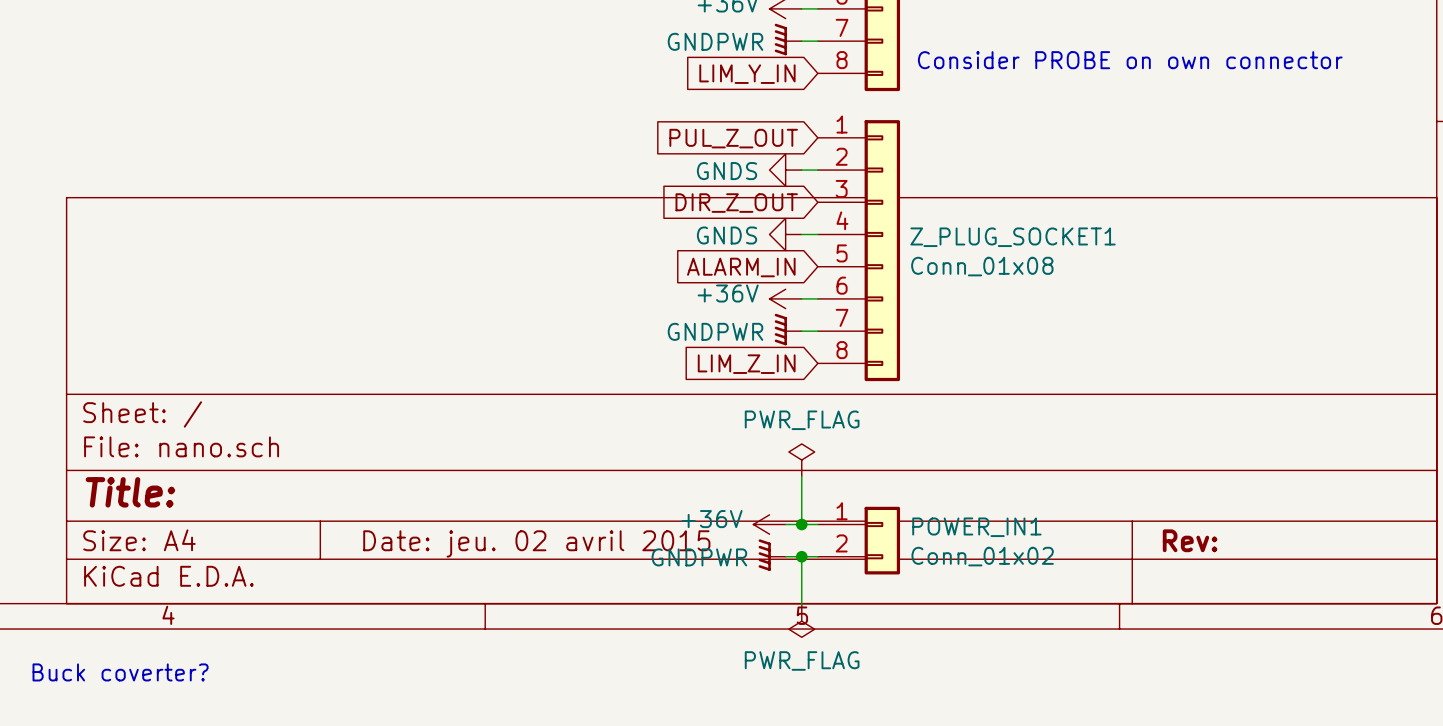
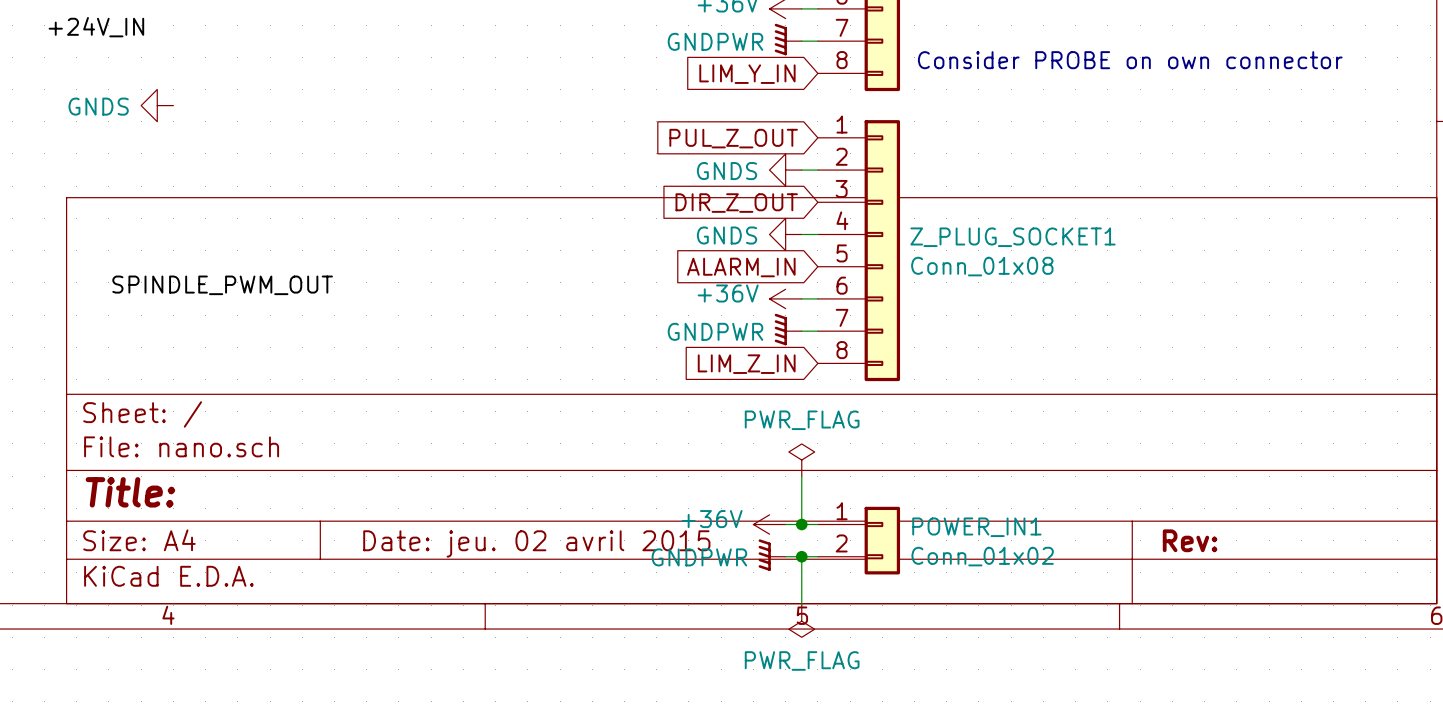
label: none -> +24V_IN (96, 27)
power symbol: none -> GNDS (157, 105)
label: none -> SPINDLE_PWM_OUT (222, 285)
text: Buck coverter? (120, 672) -> none

